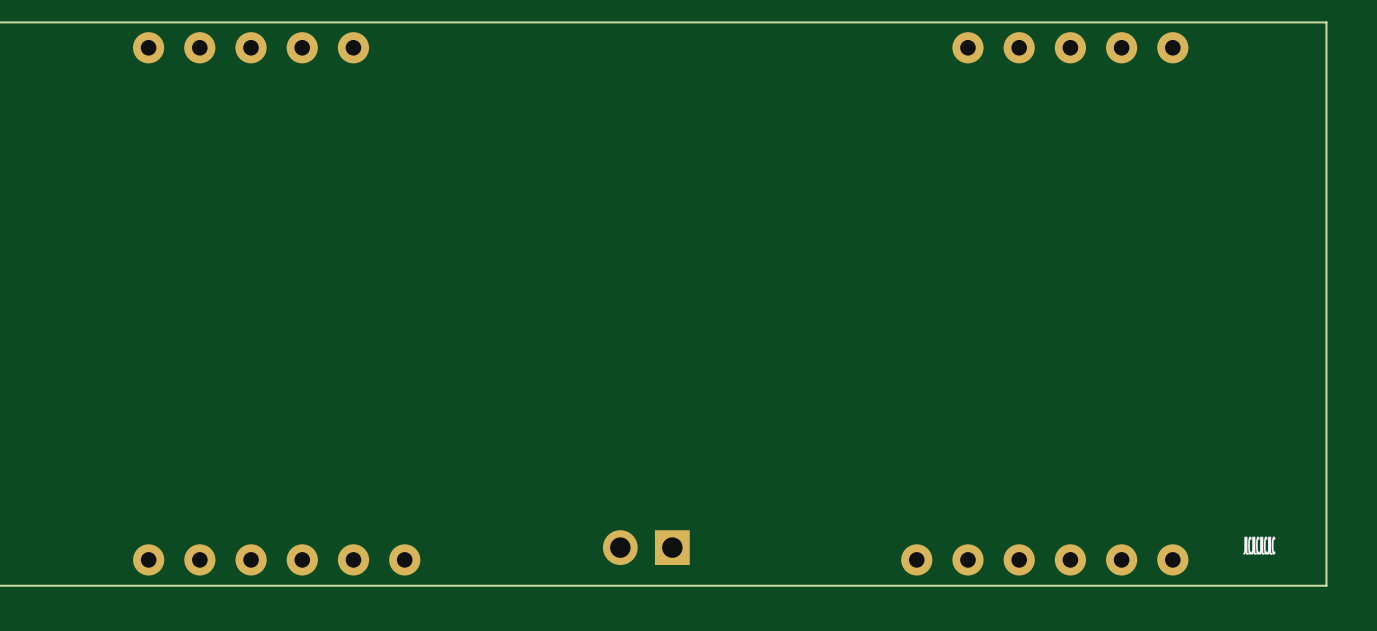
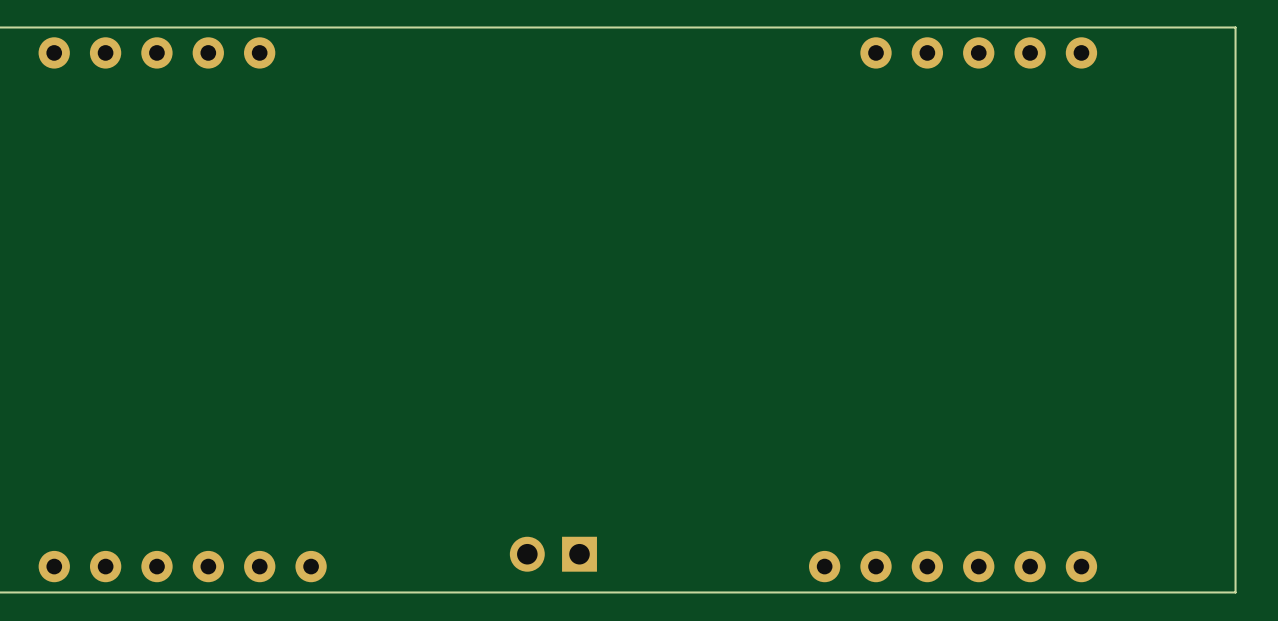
text: JLCJLCJLCJLC (1259, 545) -> none

